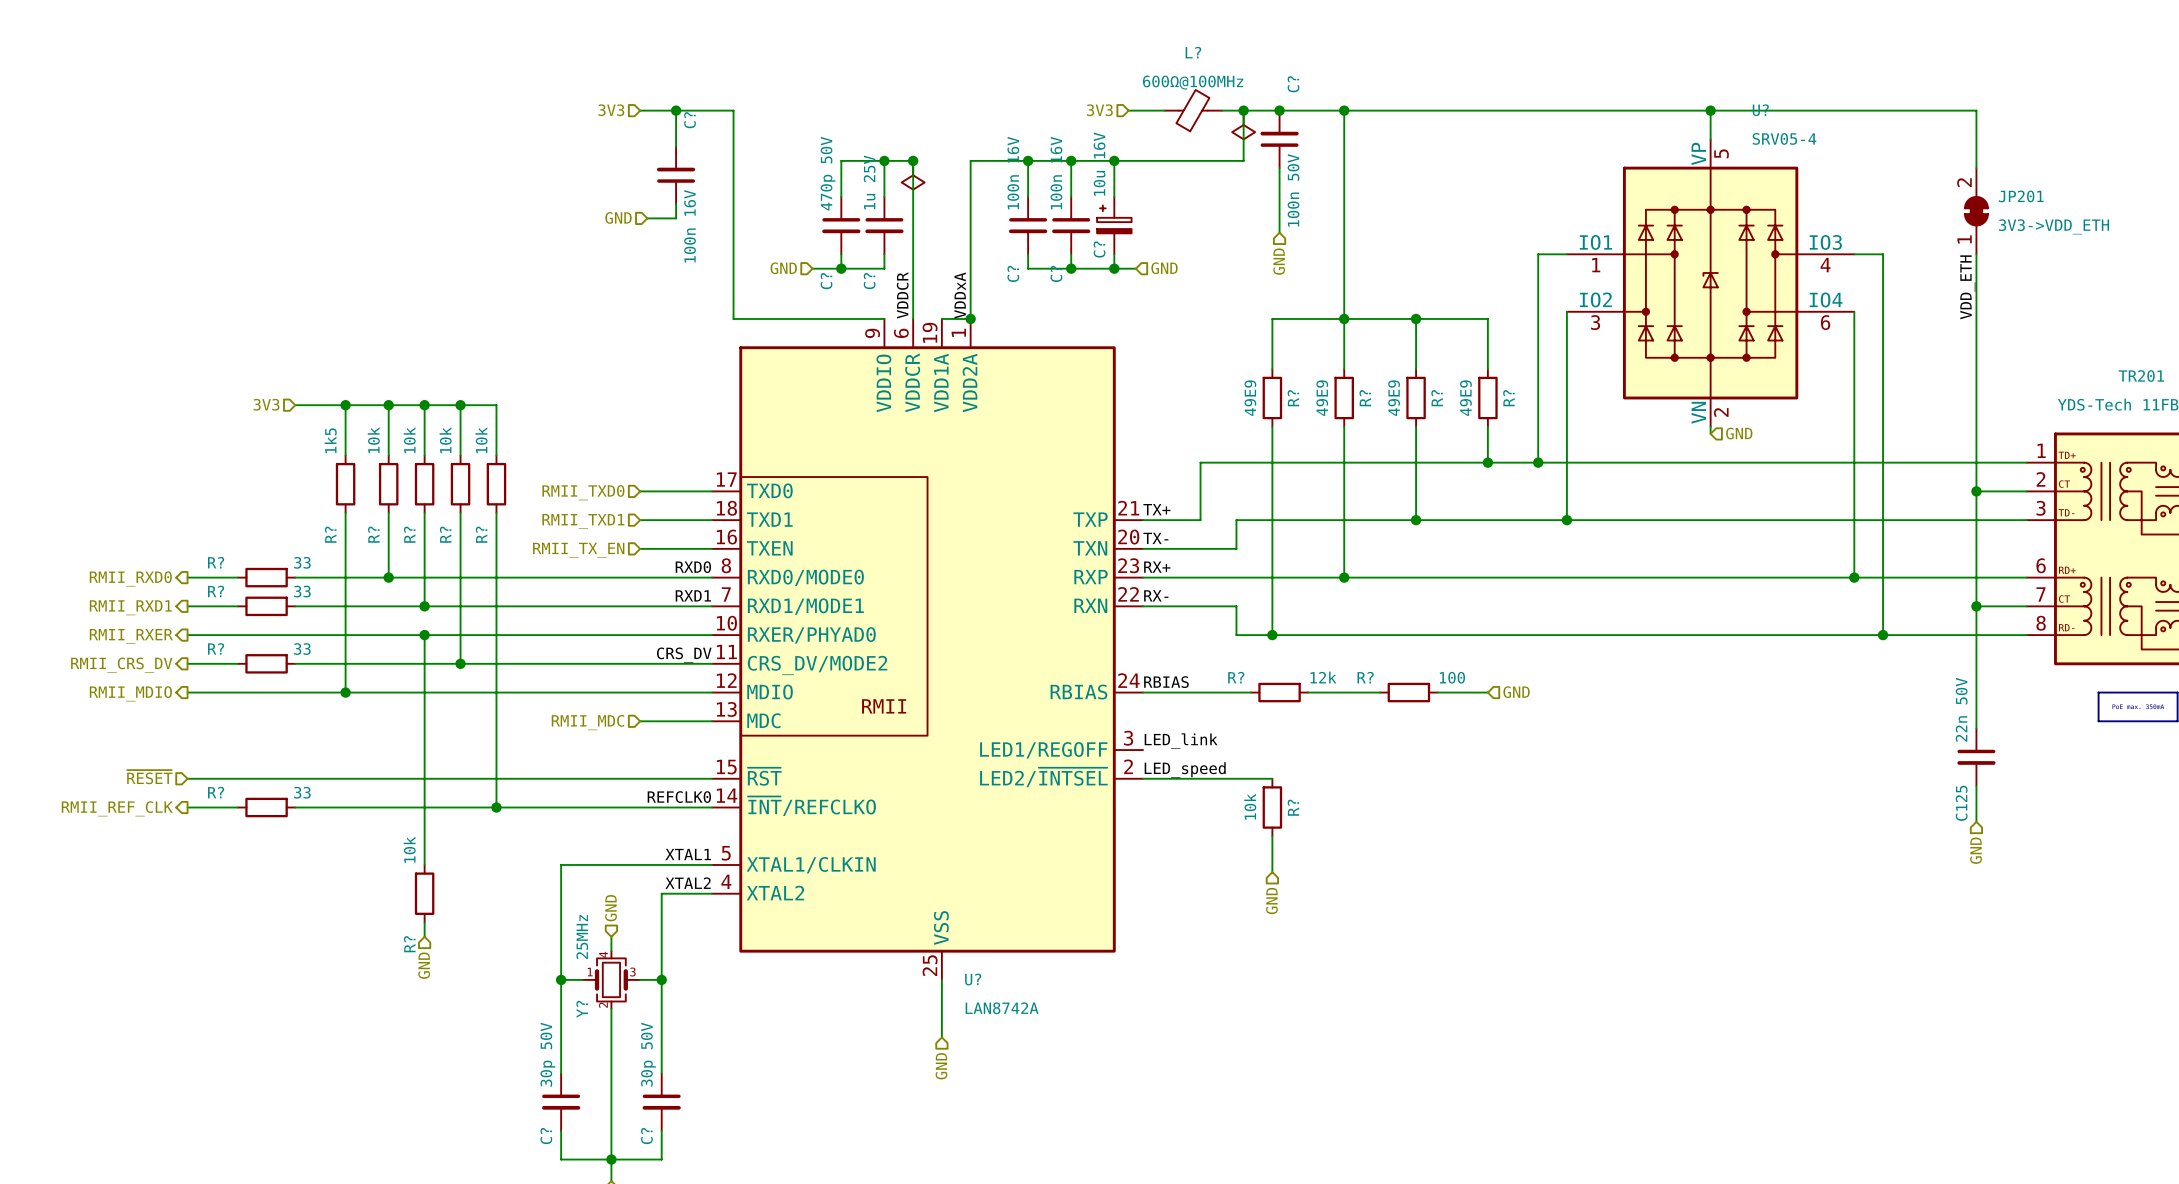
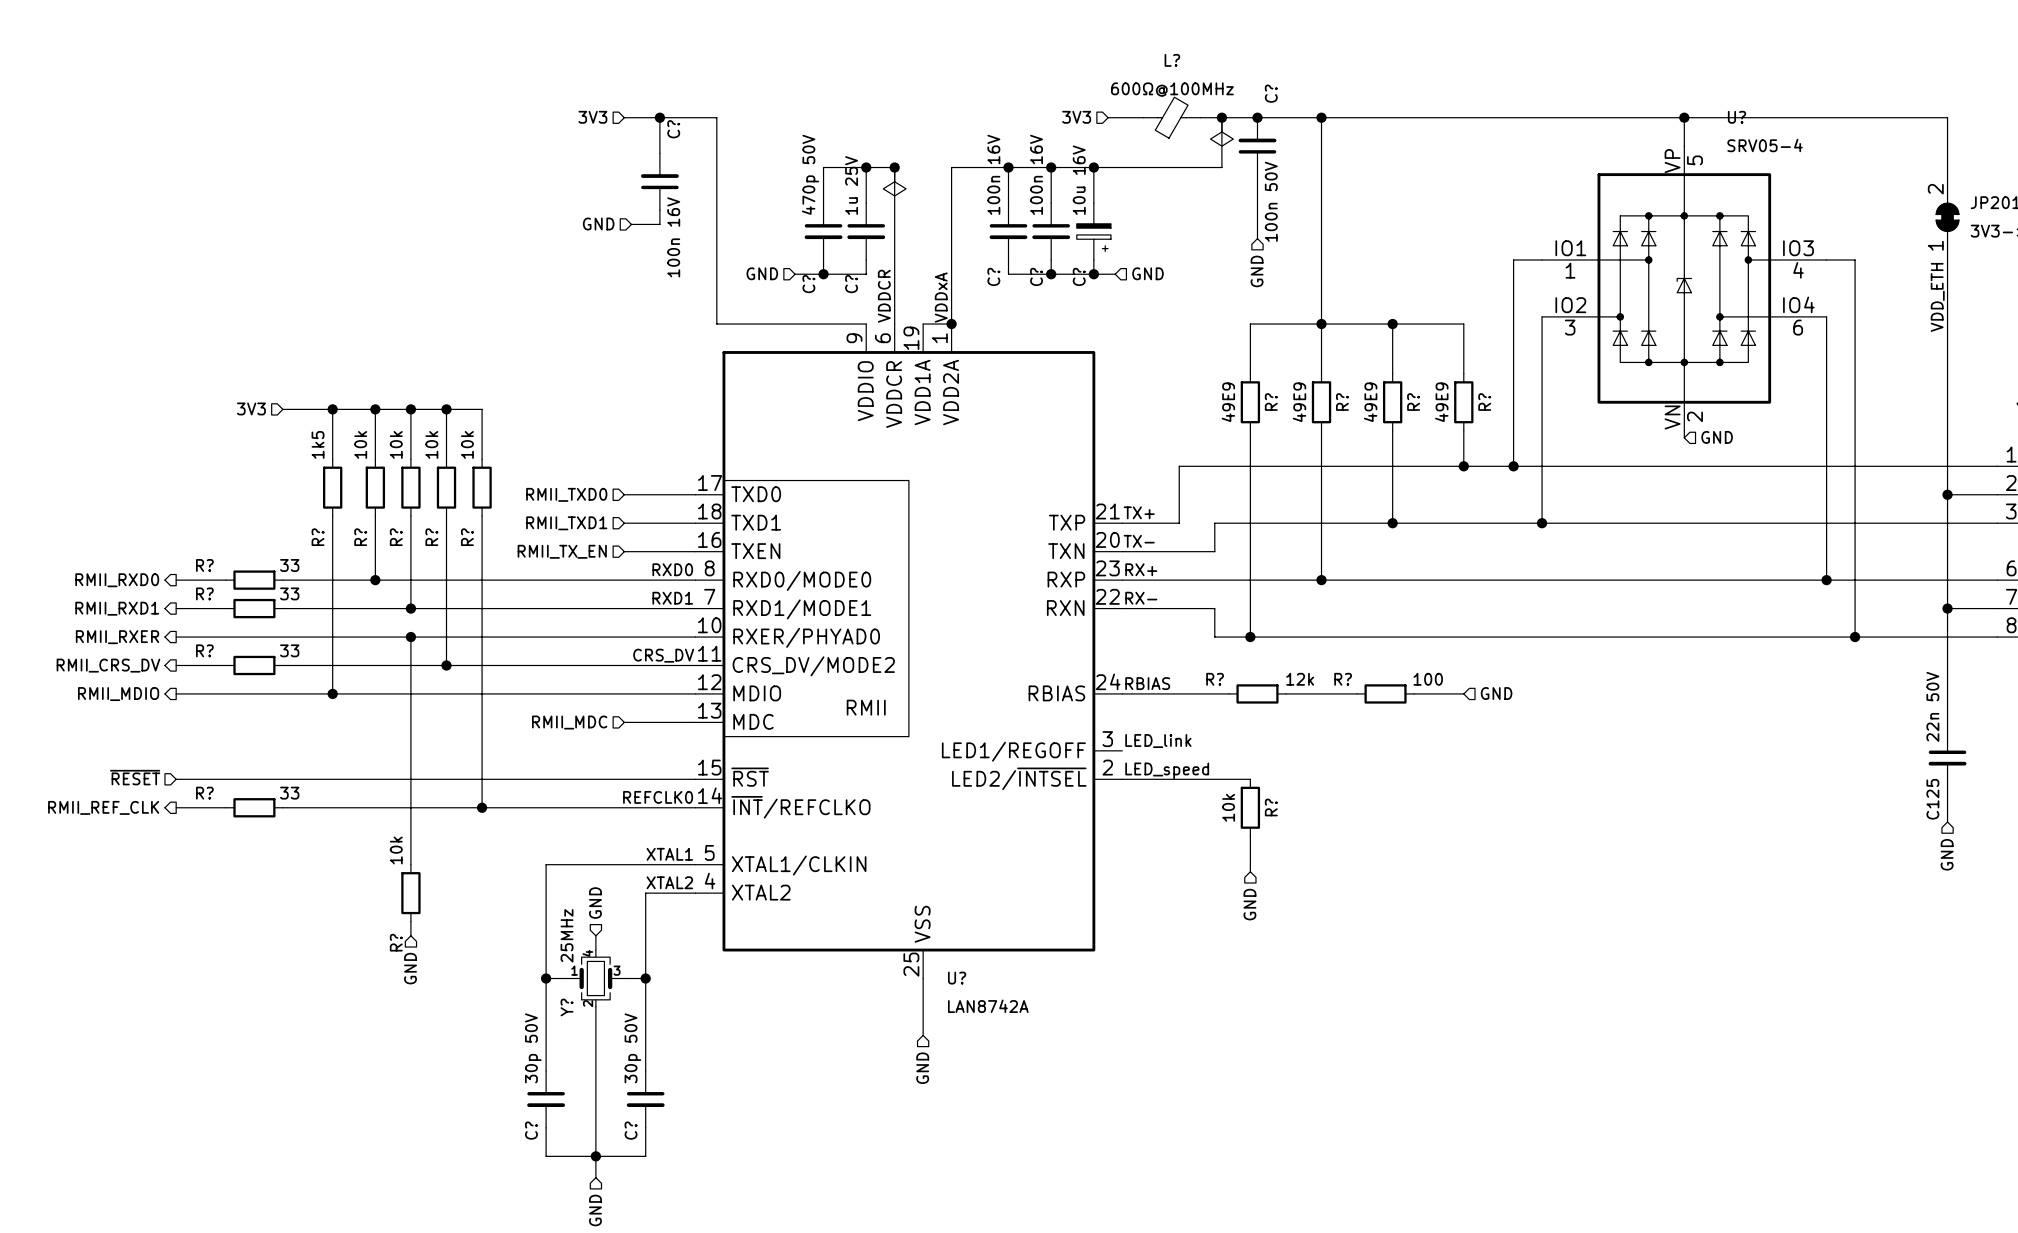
C? rotation: 0° (1114, 219) -> 180° (1093, 237)

